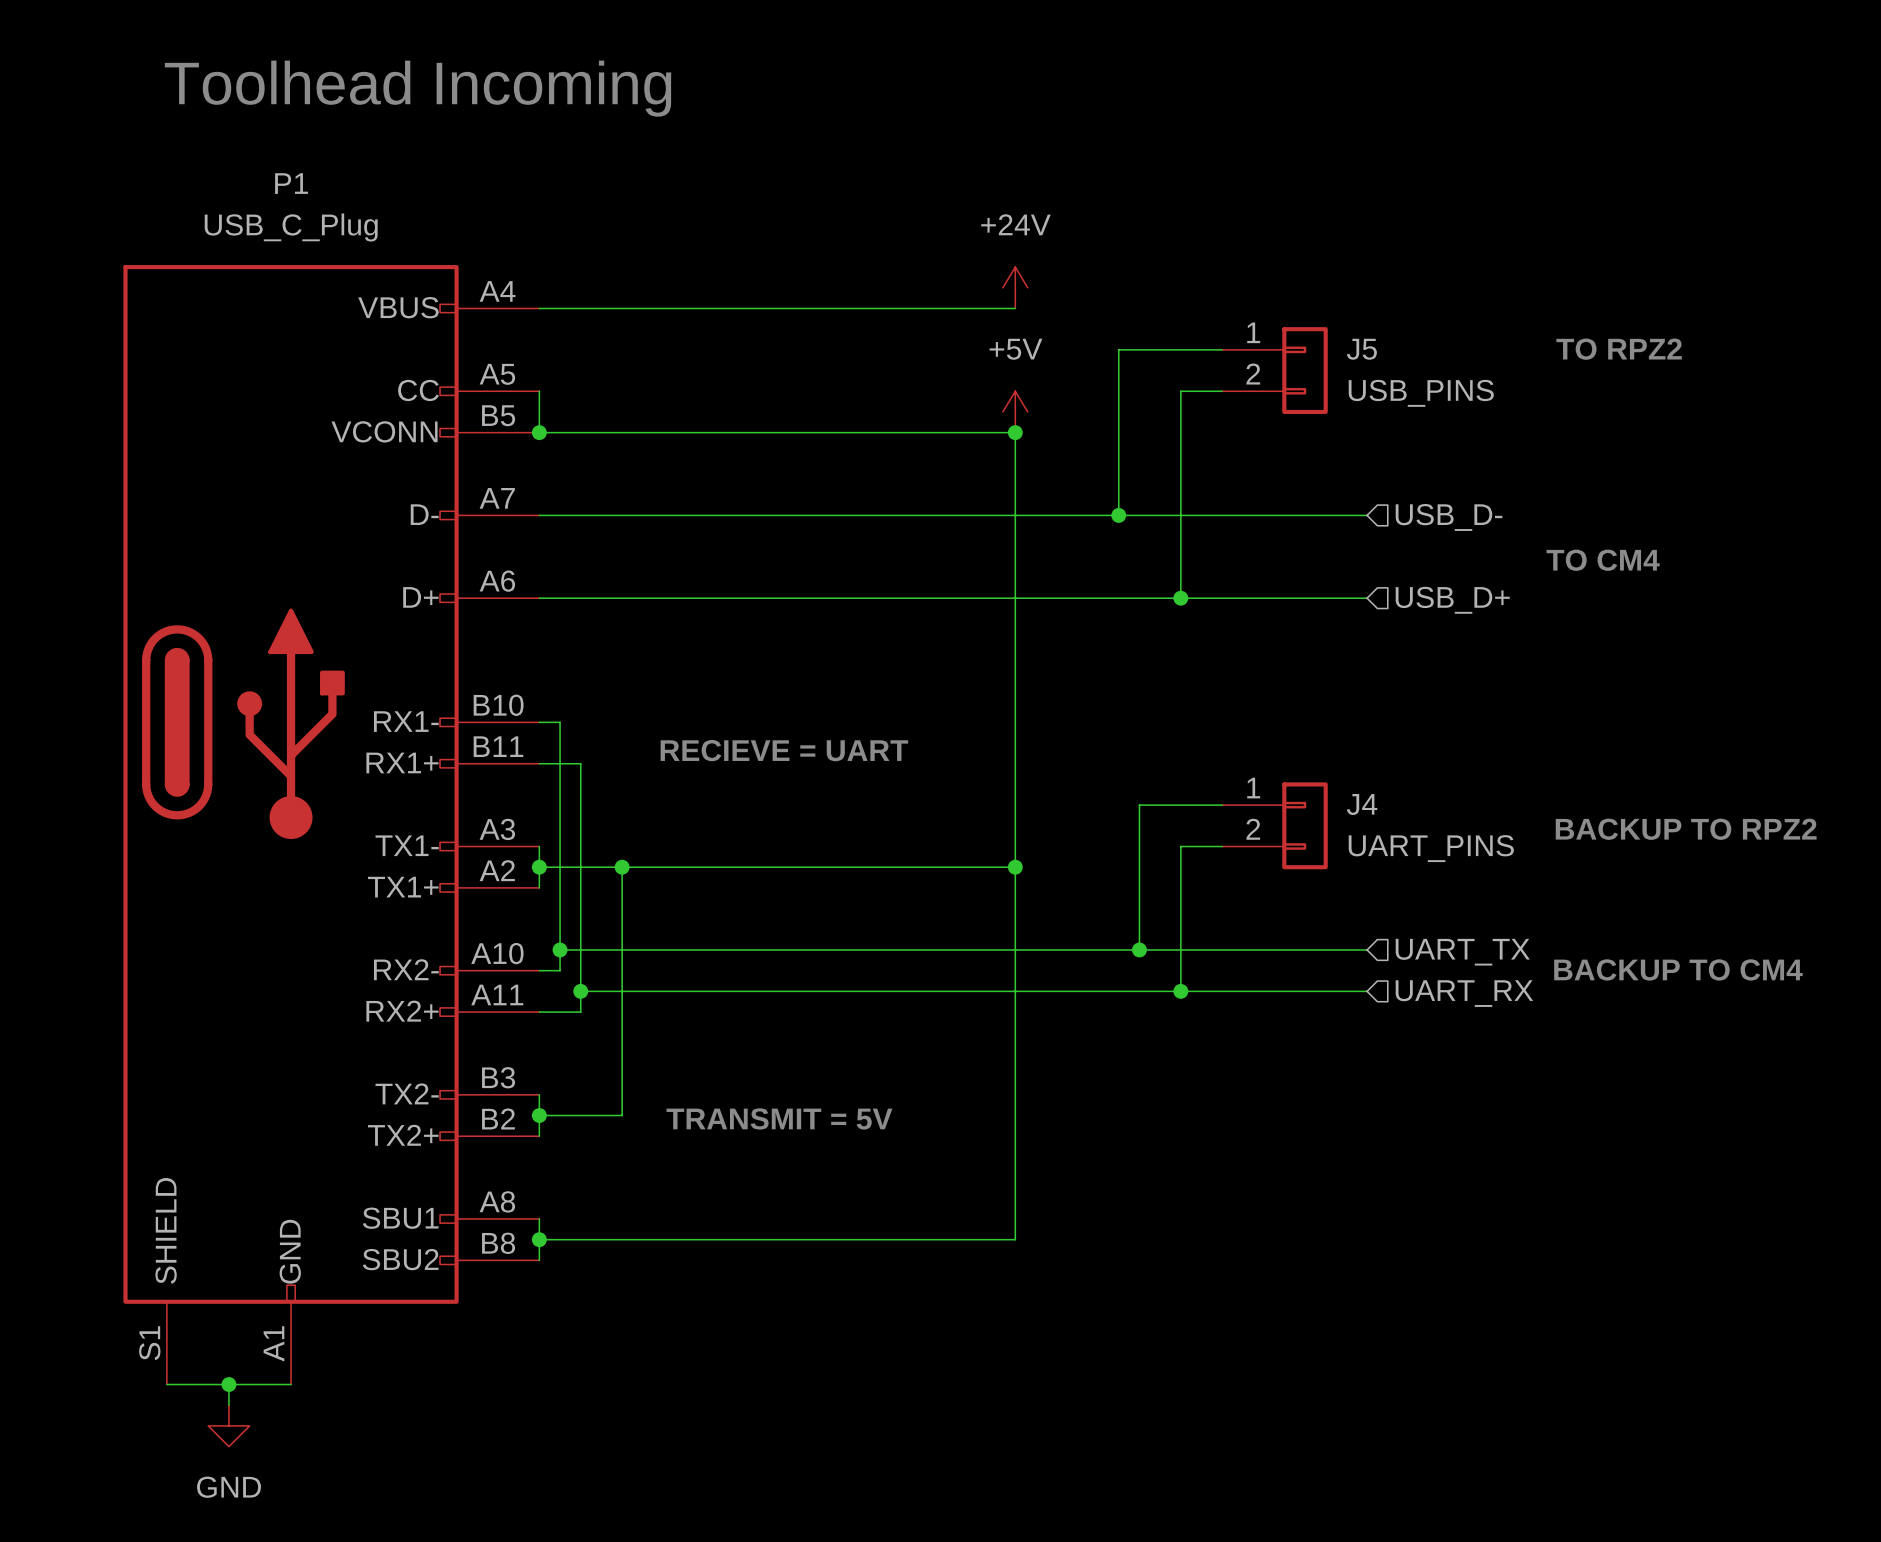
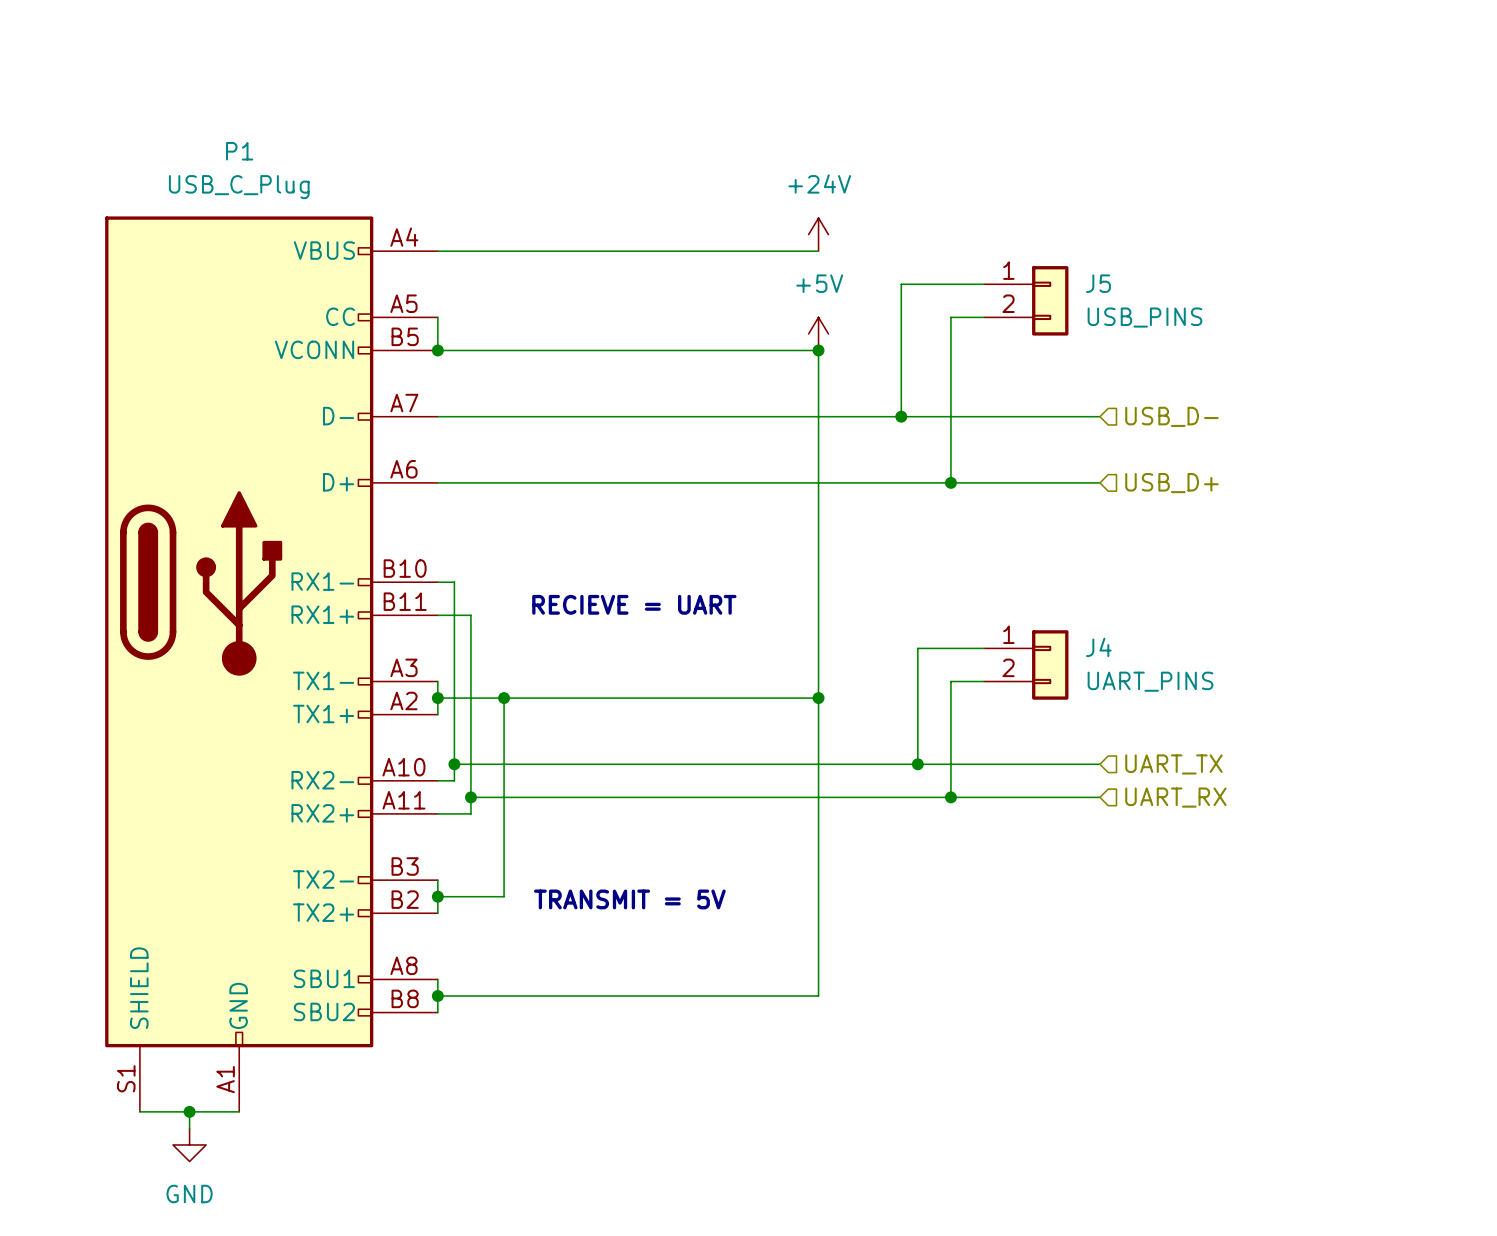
text: Toolhead Incoming (418, 88) -> none
text: TO RPZ2 (1619, 349) -> none
text: TO CM4 (1603, 560) -> none
text: BACKUP TO RPZ2 (1686, 829) -> none
text: BACKUP TO CM4 (1678, 969) -> none

